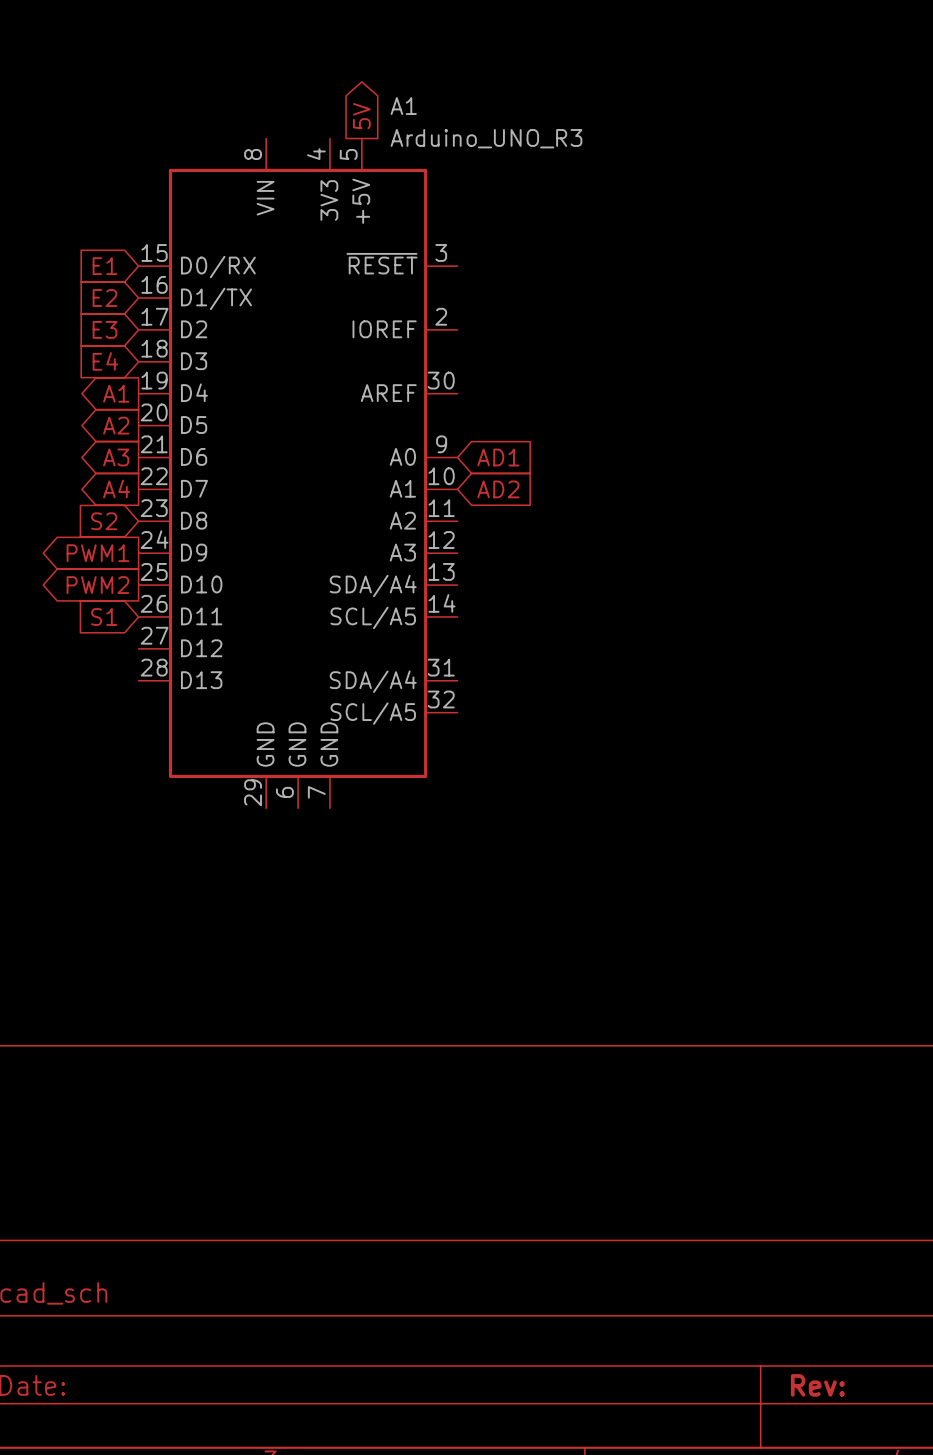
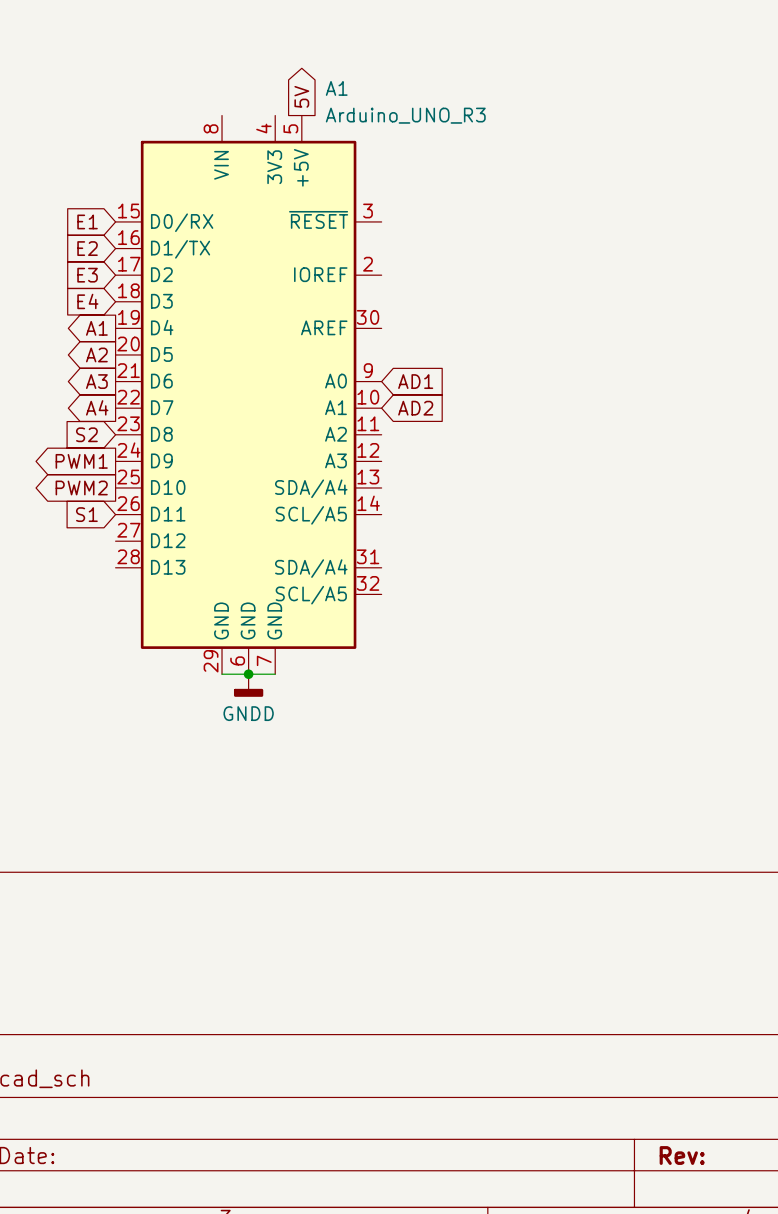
wire: none -> (222, 674) (275, 674)
junction: none -> (248, 674)
power symbol: none -> GNDD (248, 685)

